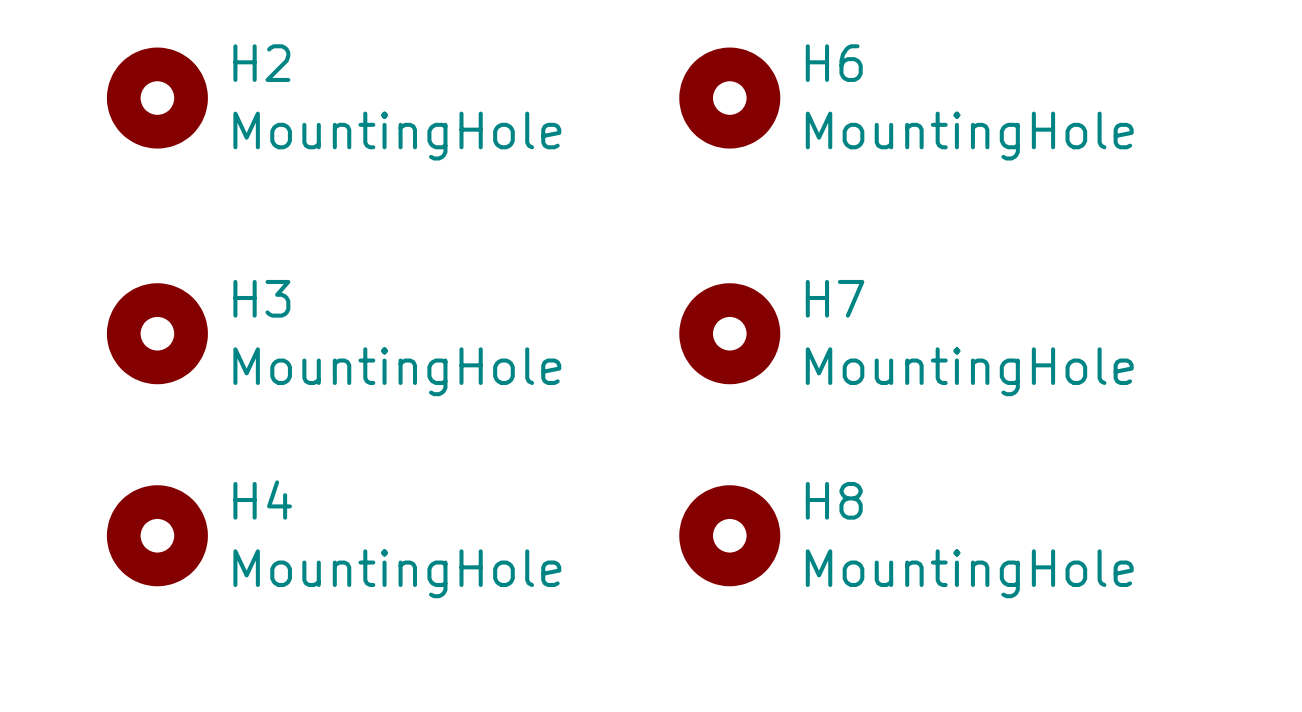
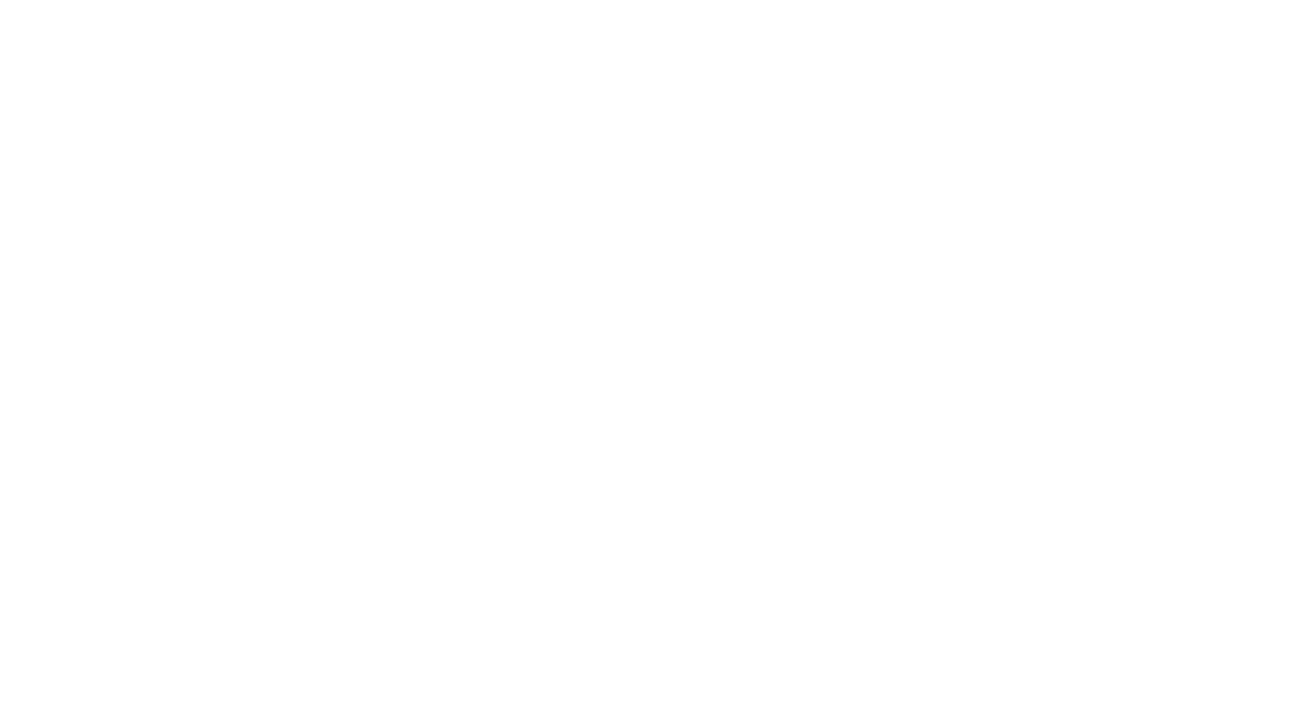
H2: MountingHole (157, 98) -> none
H6: MountingHole (729, 98) -> none
H3: MountingHole (157, 333) -> none
H7: MountingHole (729, 333) -> none
H4: MountingHole (157, 535) -> none
H8: MountingHole (729, 535) -> none

